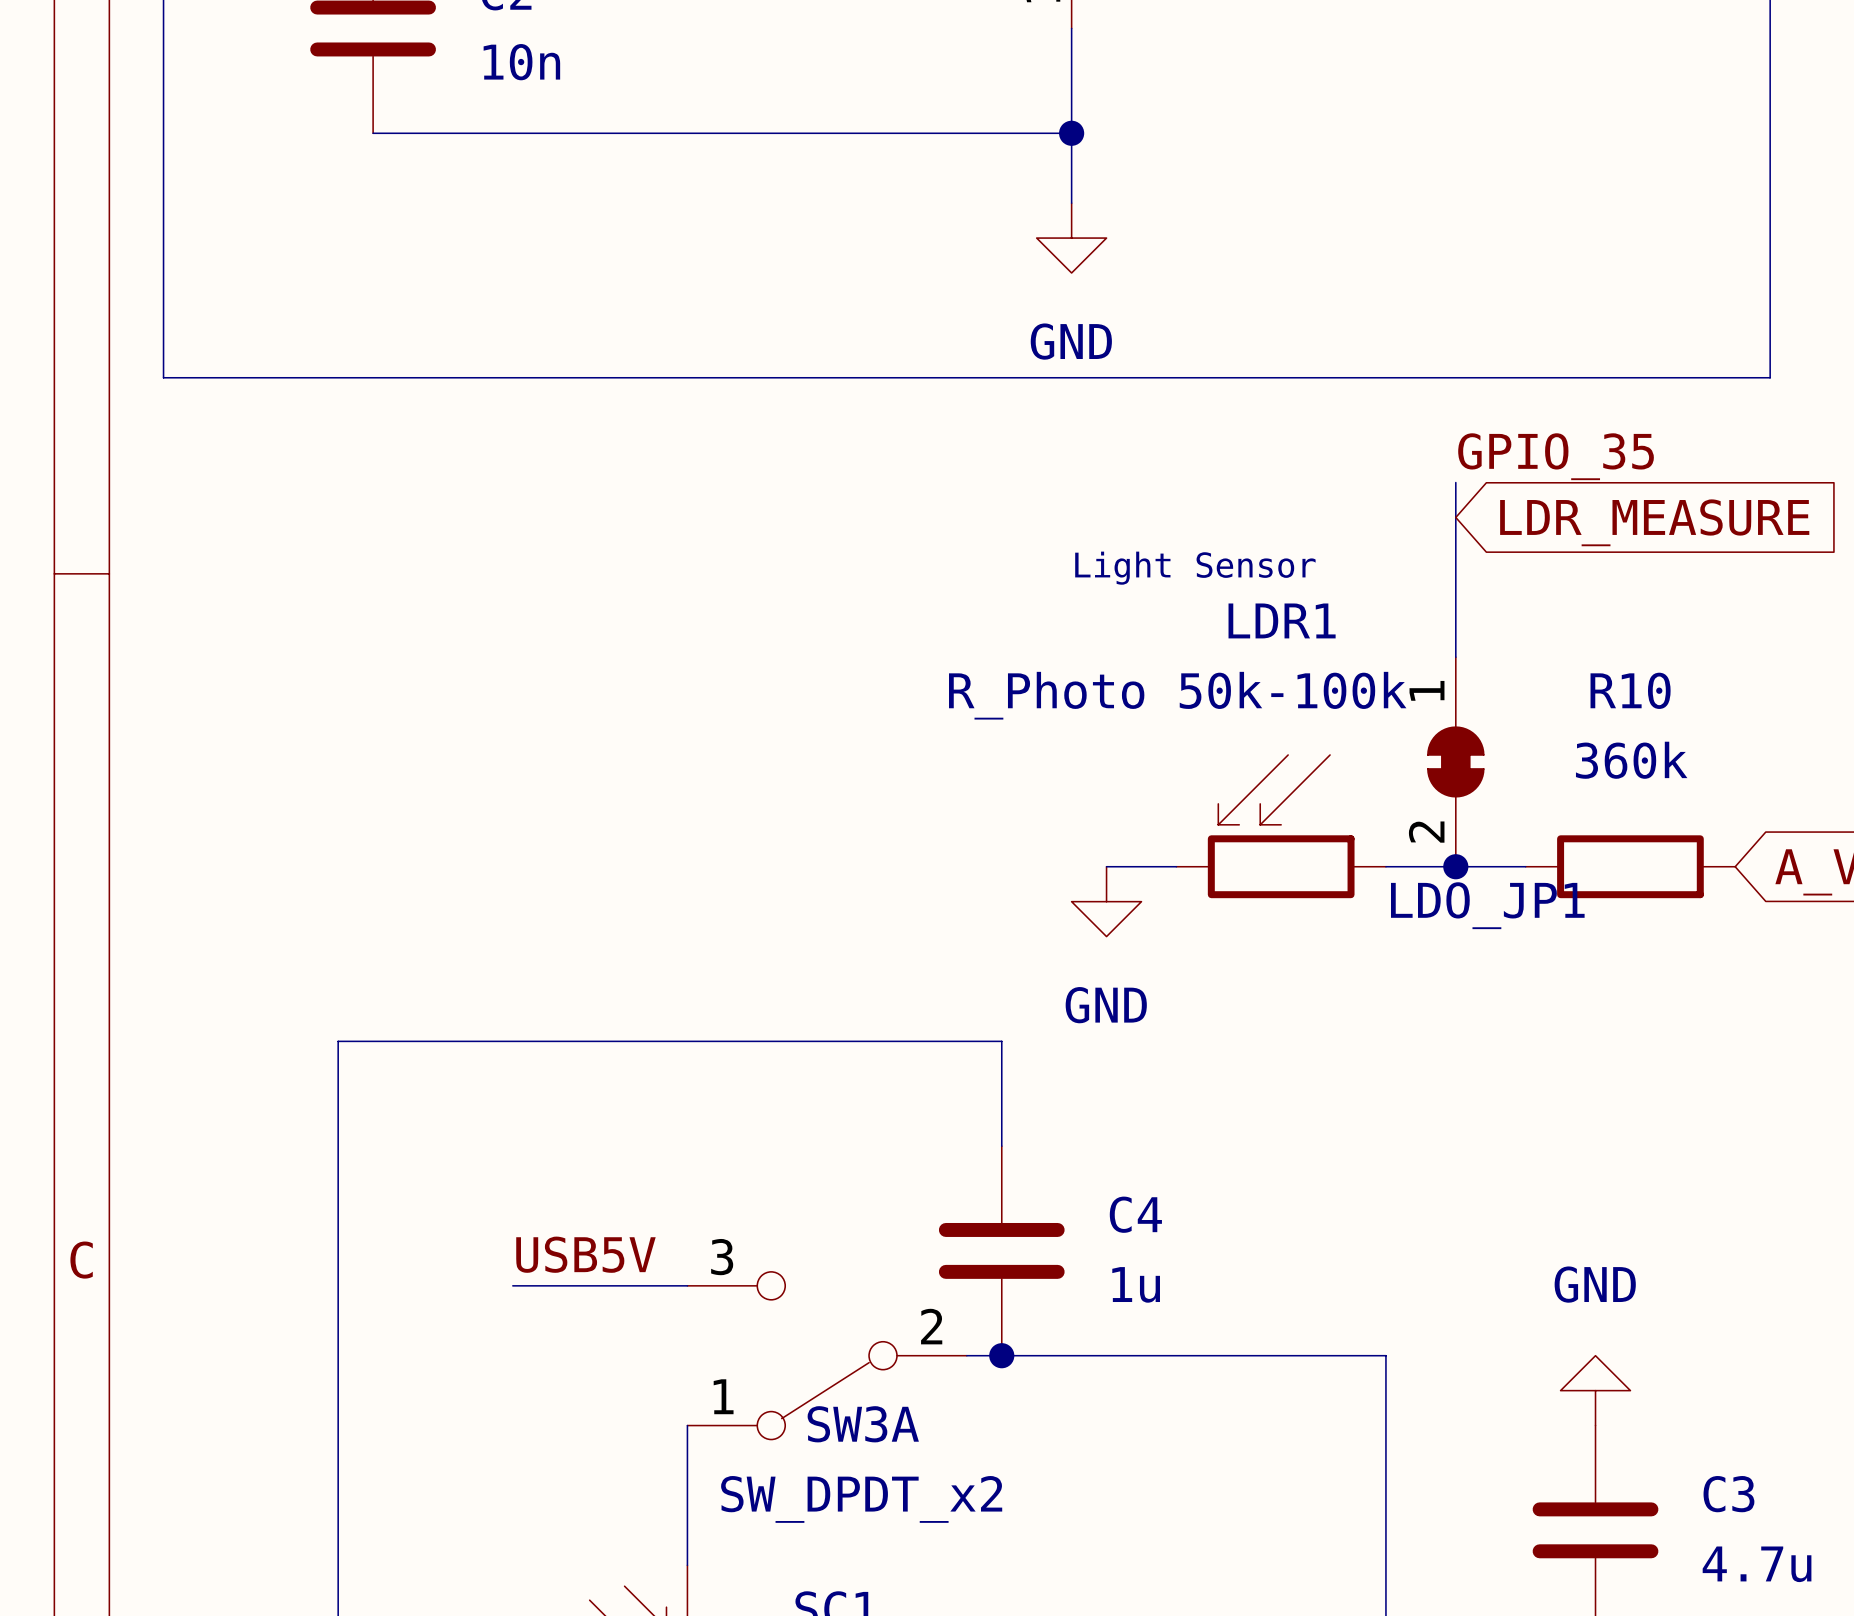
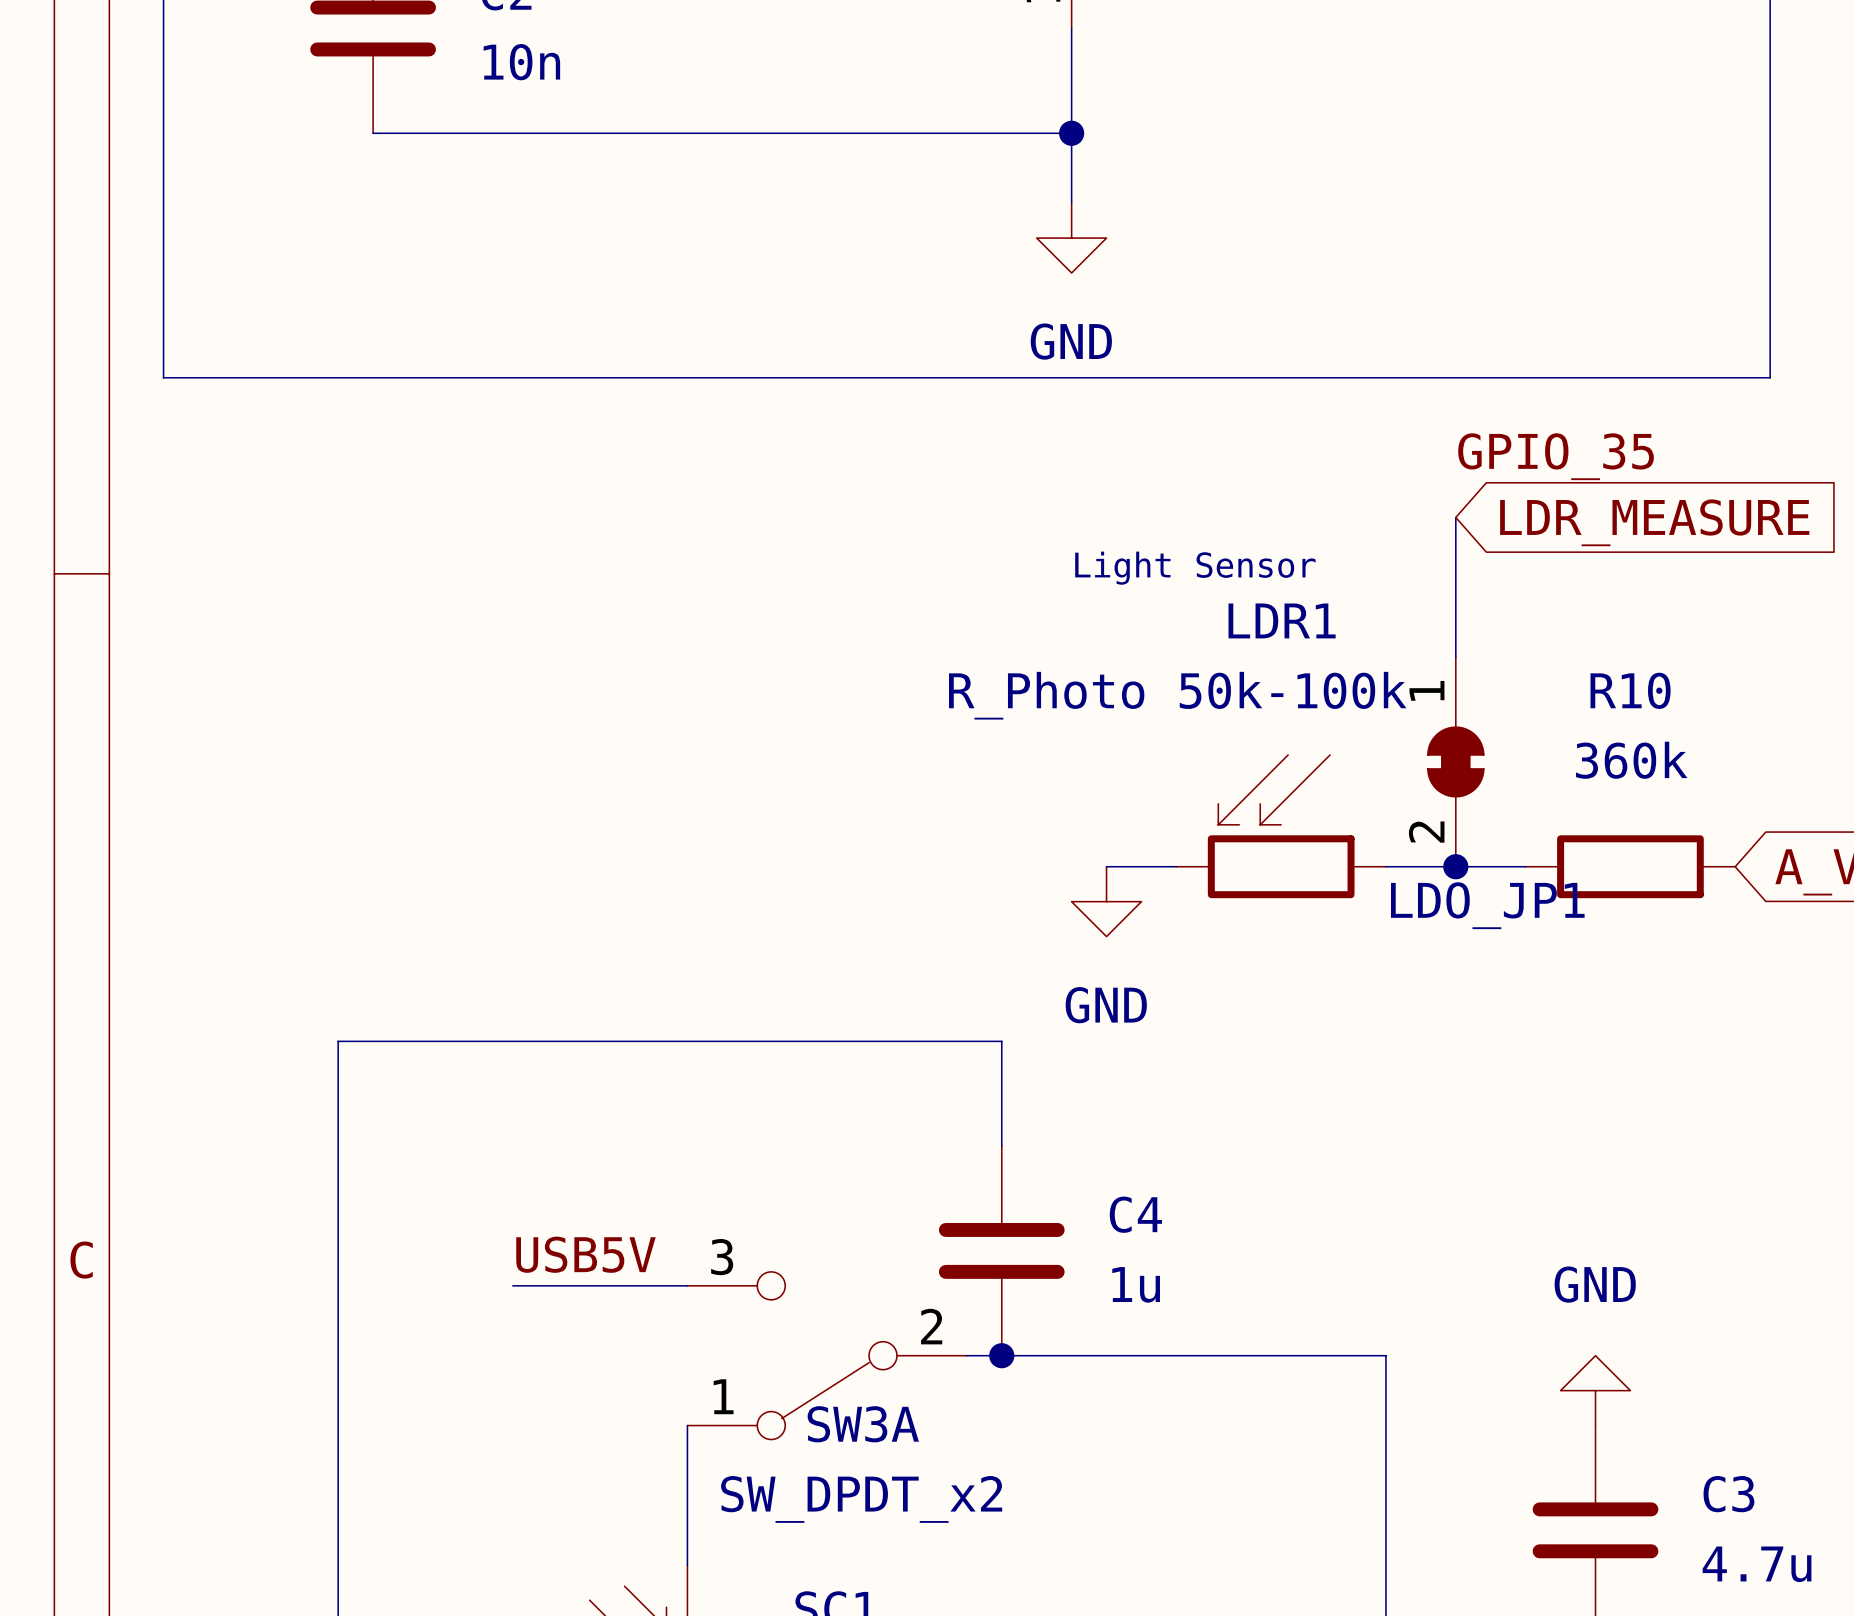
wire: (1455, 482) (1455, 517) -> none

